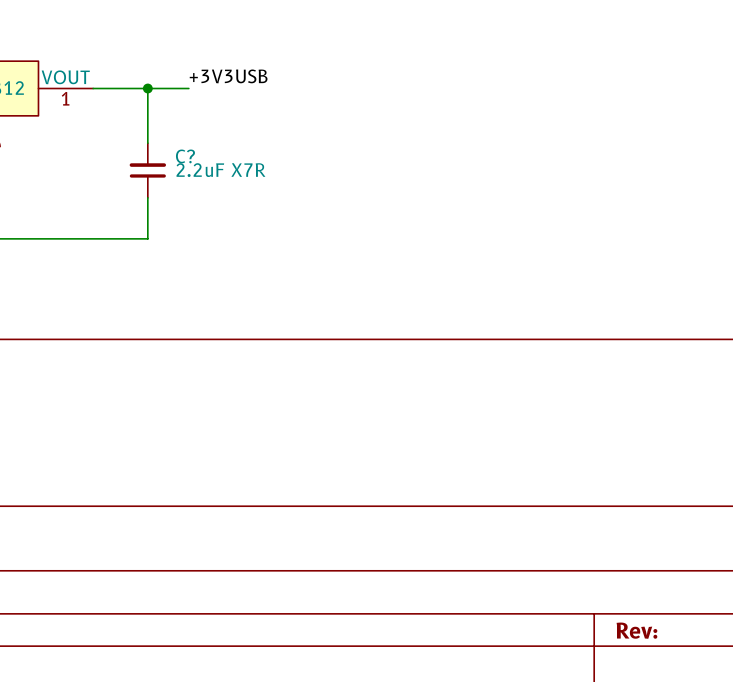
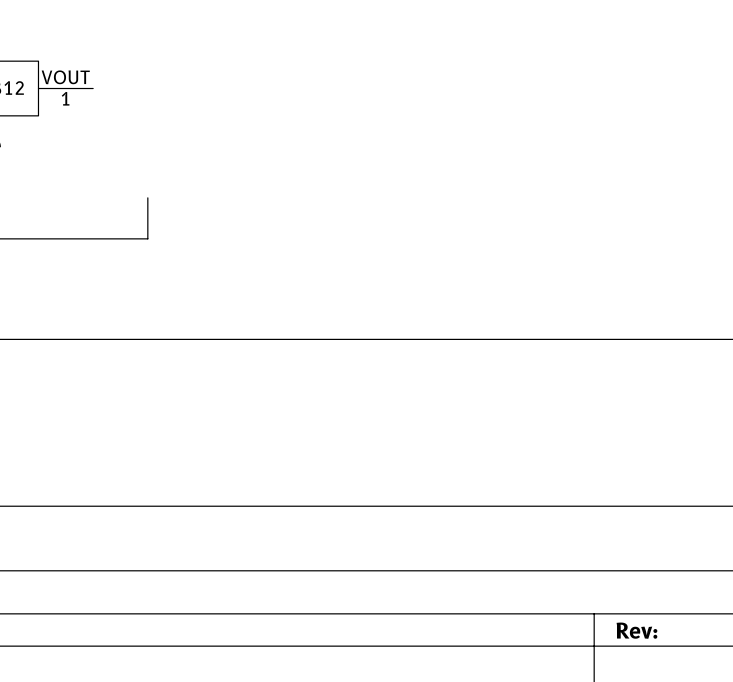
label: +3V3USB (228, 76) -> none
wire: (93, 88) (188, 88) -> none
wire: (147, 88) (147, 143) -> none
junction: (147, 88) -> none
C?: 2.2uF X7R (147, 170) -> none

